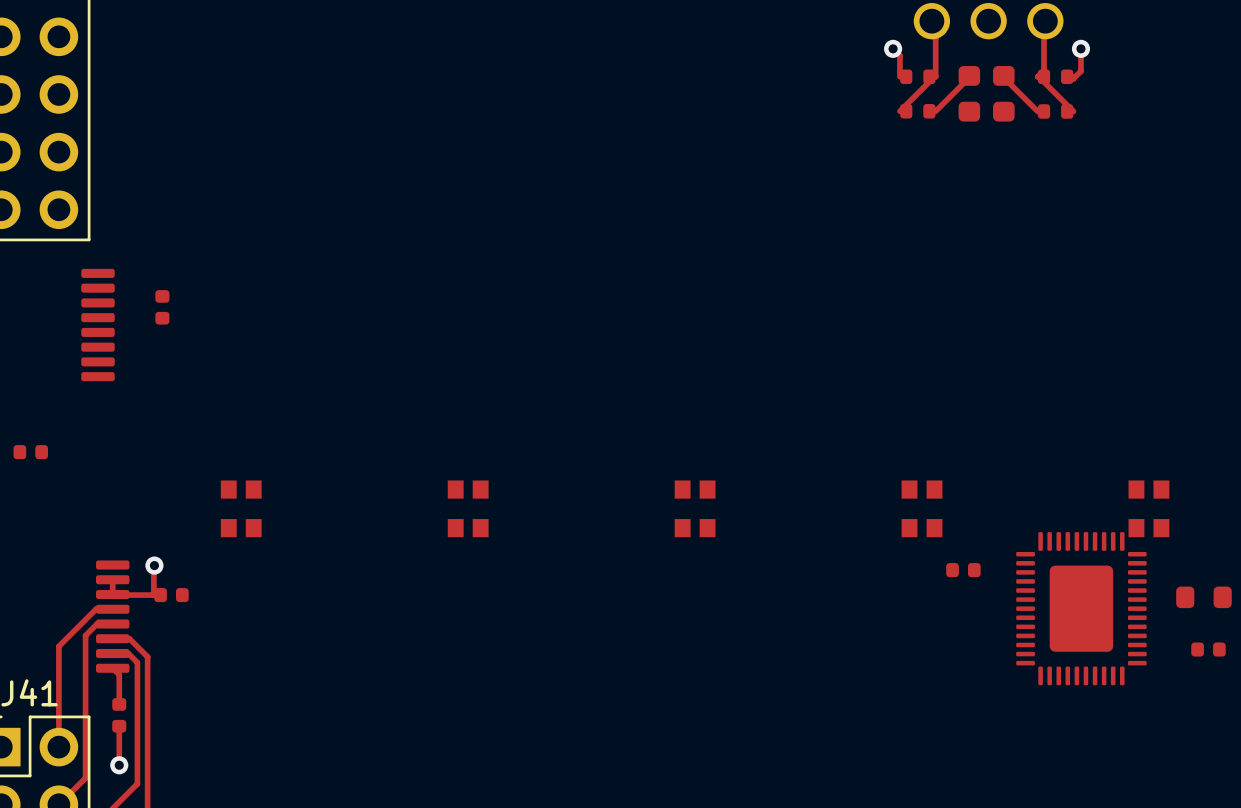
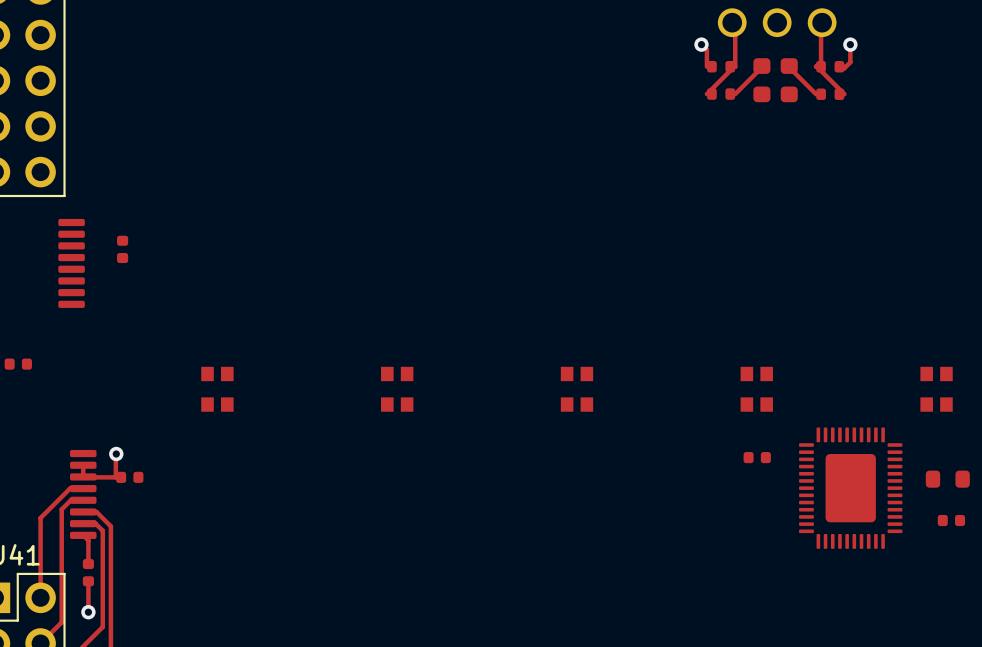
part position: (241, 508) -> (217, 389)
part position: (468, 508) -> (397, 389)
part position: (695, 508) -> (576, 389)
part position: (922, 508) -> (756, 389)
part position: (1148, 508) -> (936, 389)

